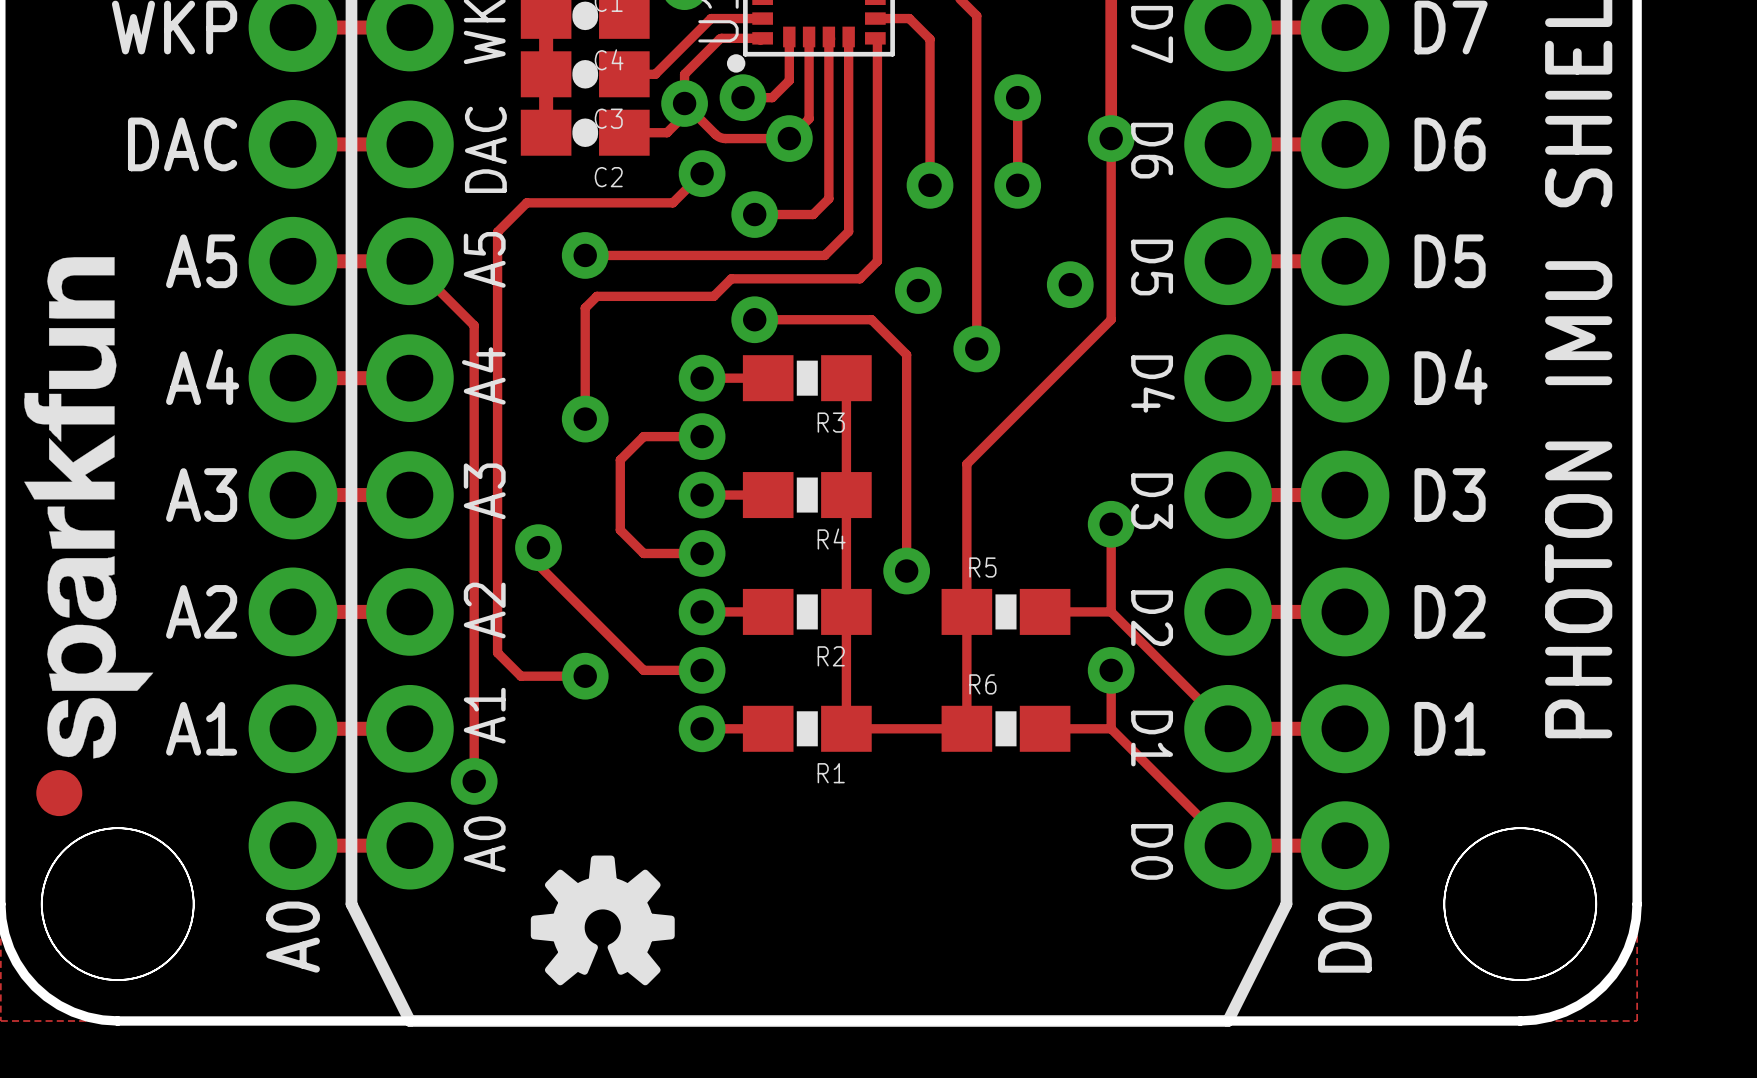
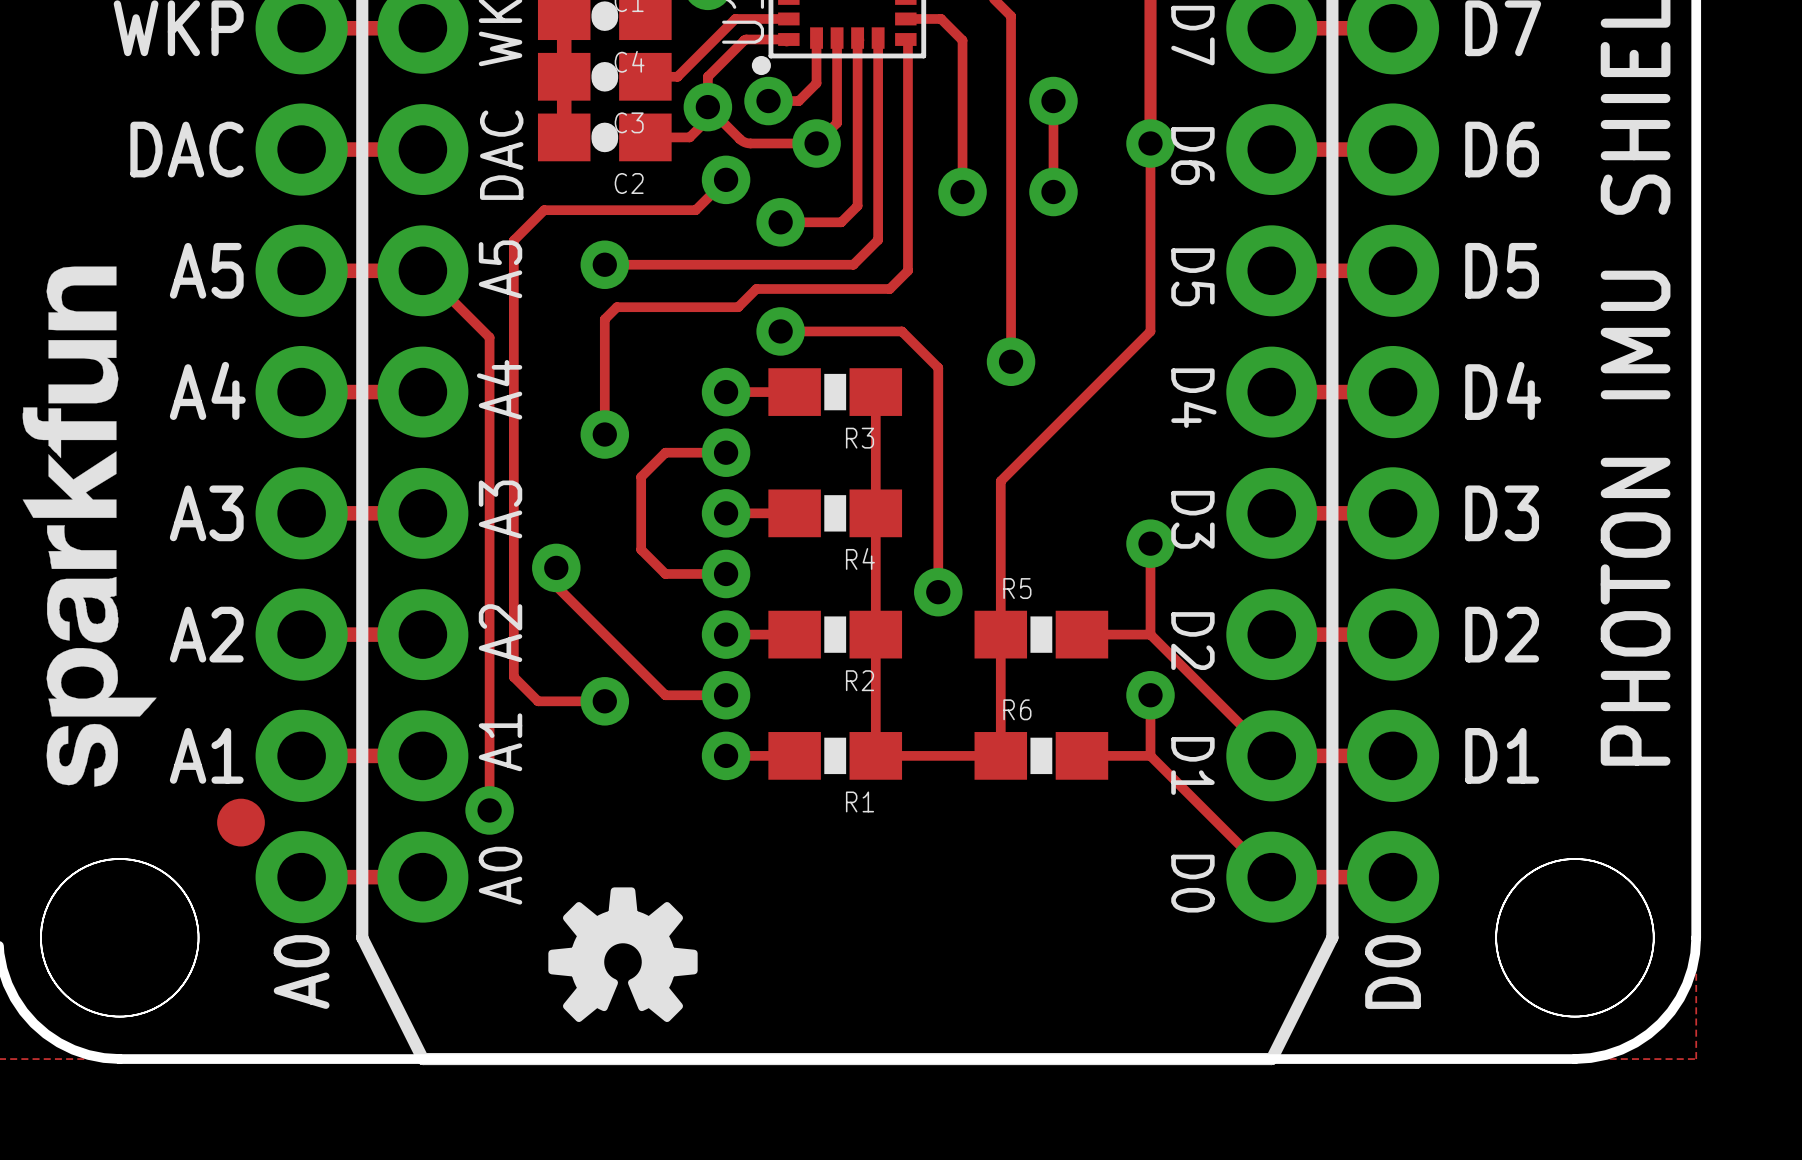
via: (1070, 284) -> none
via: (918, 290) -> none
part position: (59, 793) -> (241, 822)

